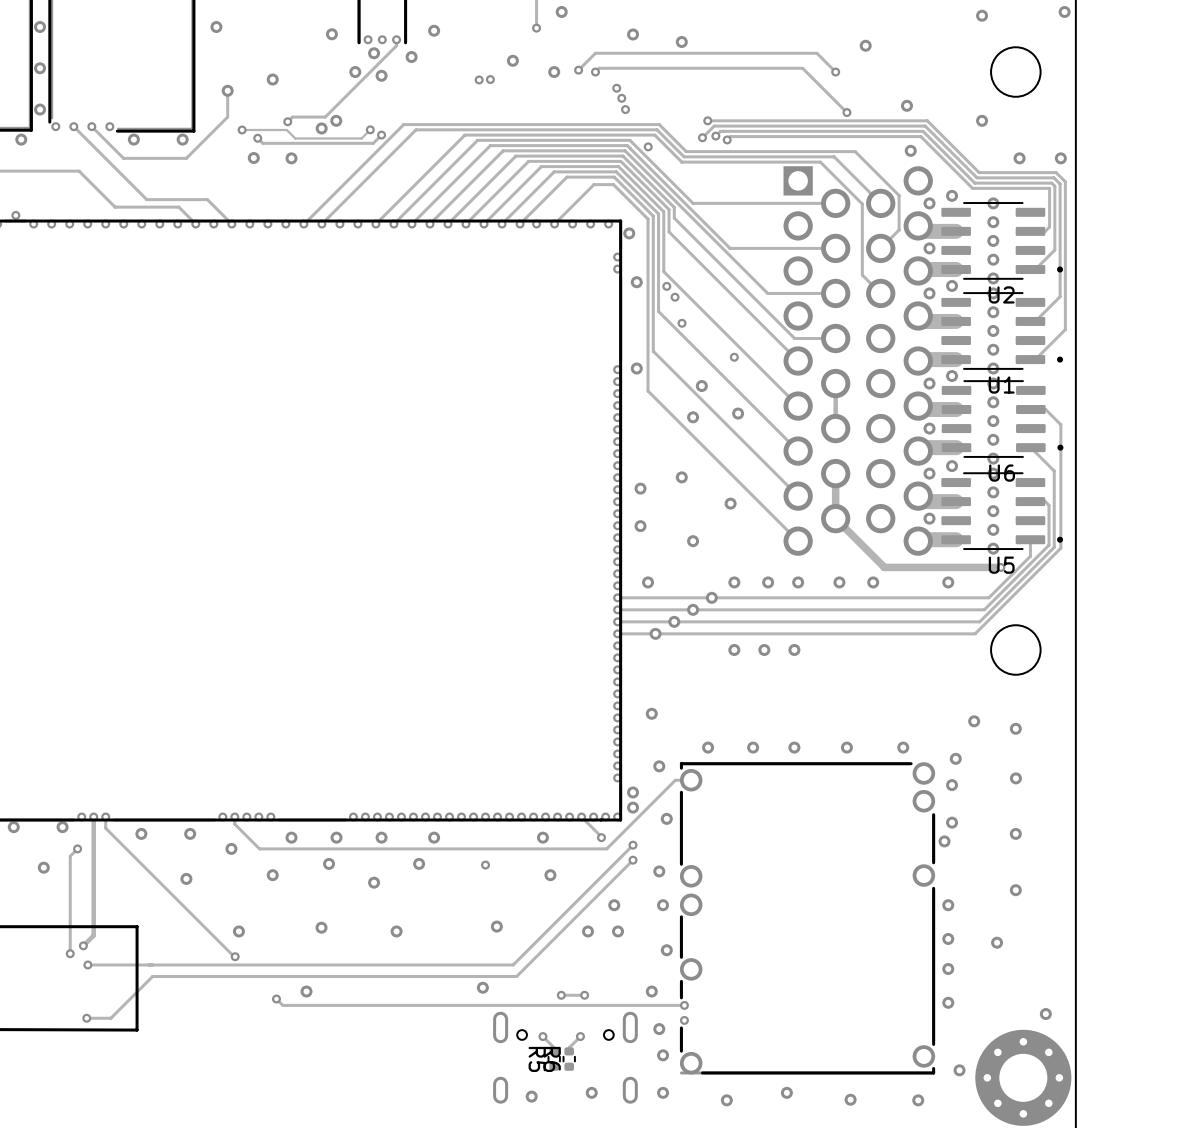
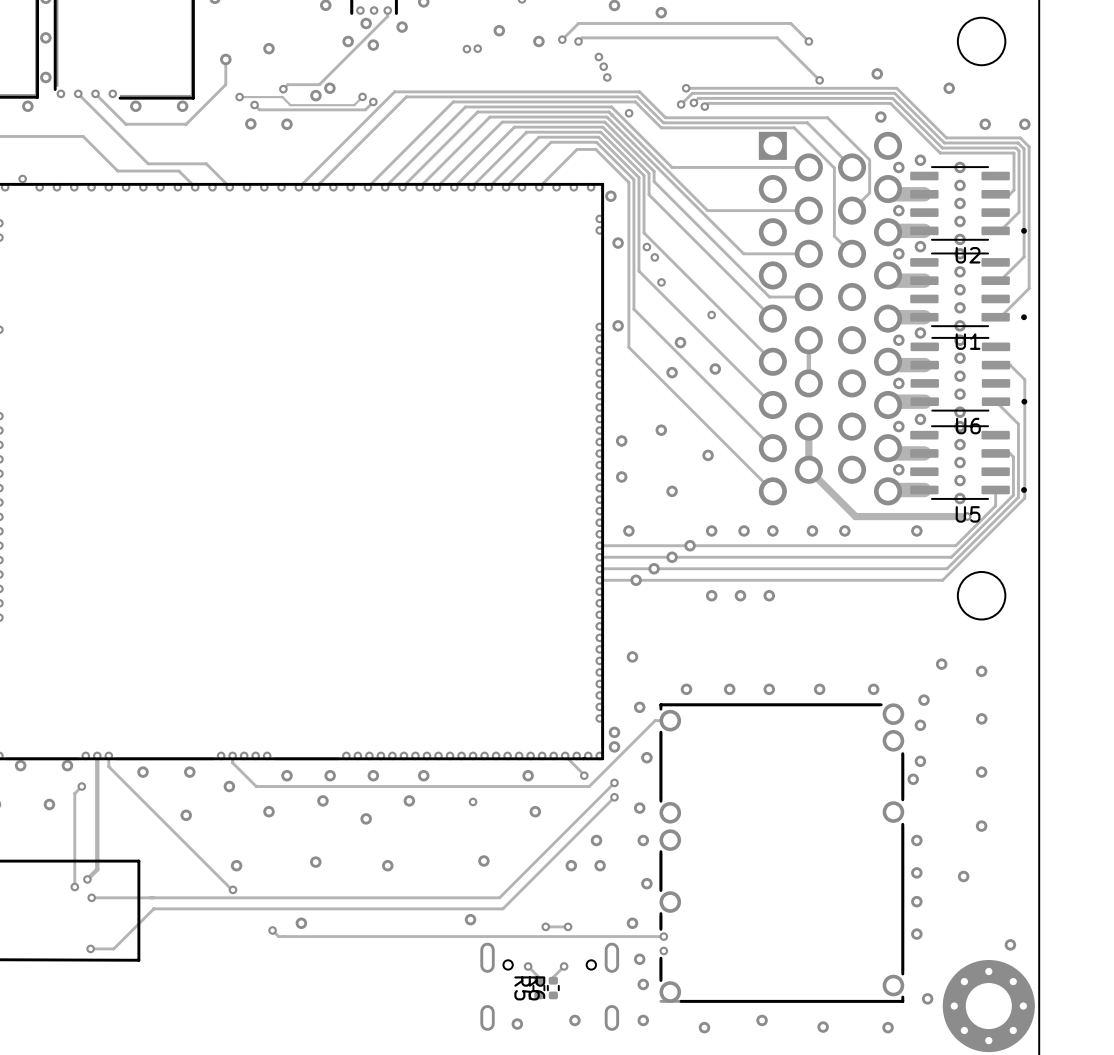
via: (865, 45) -> none

